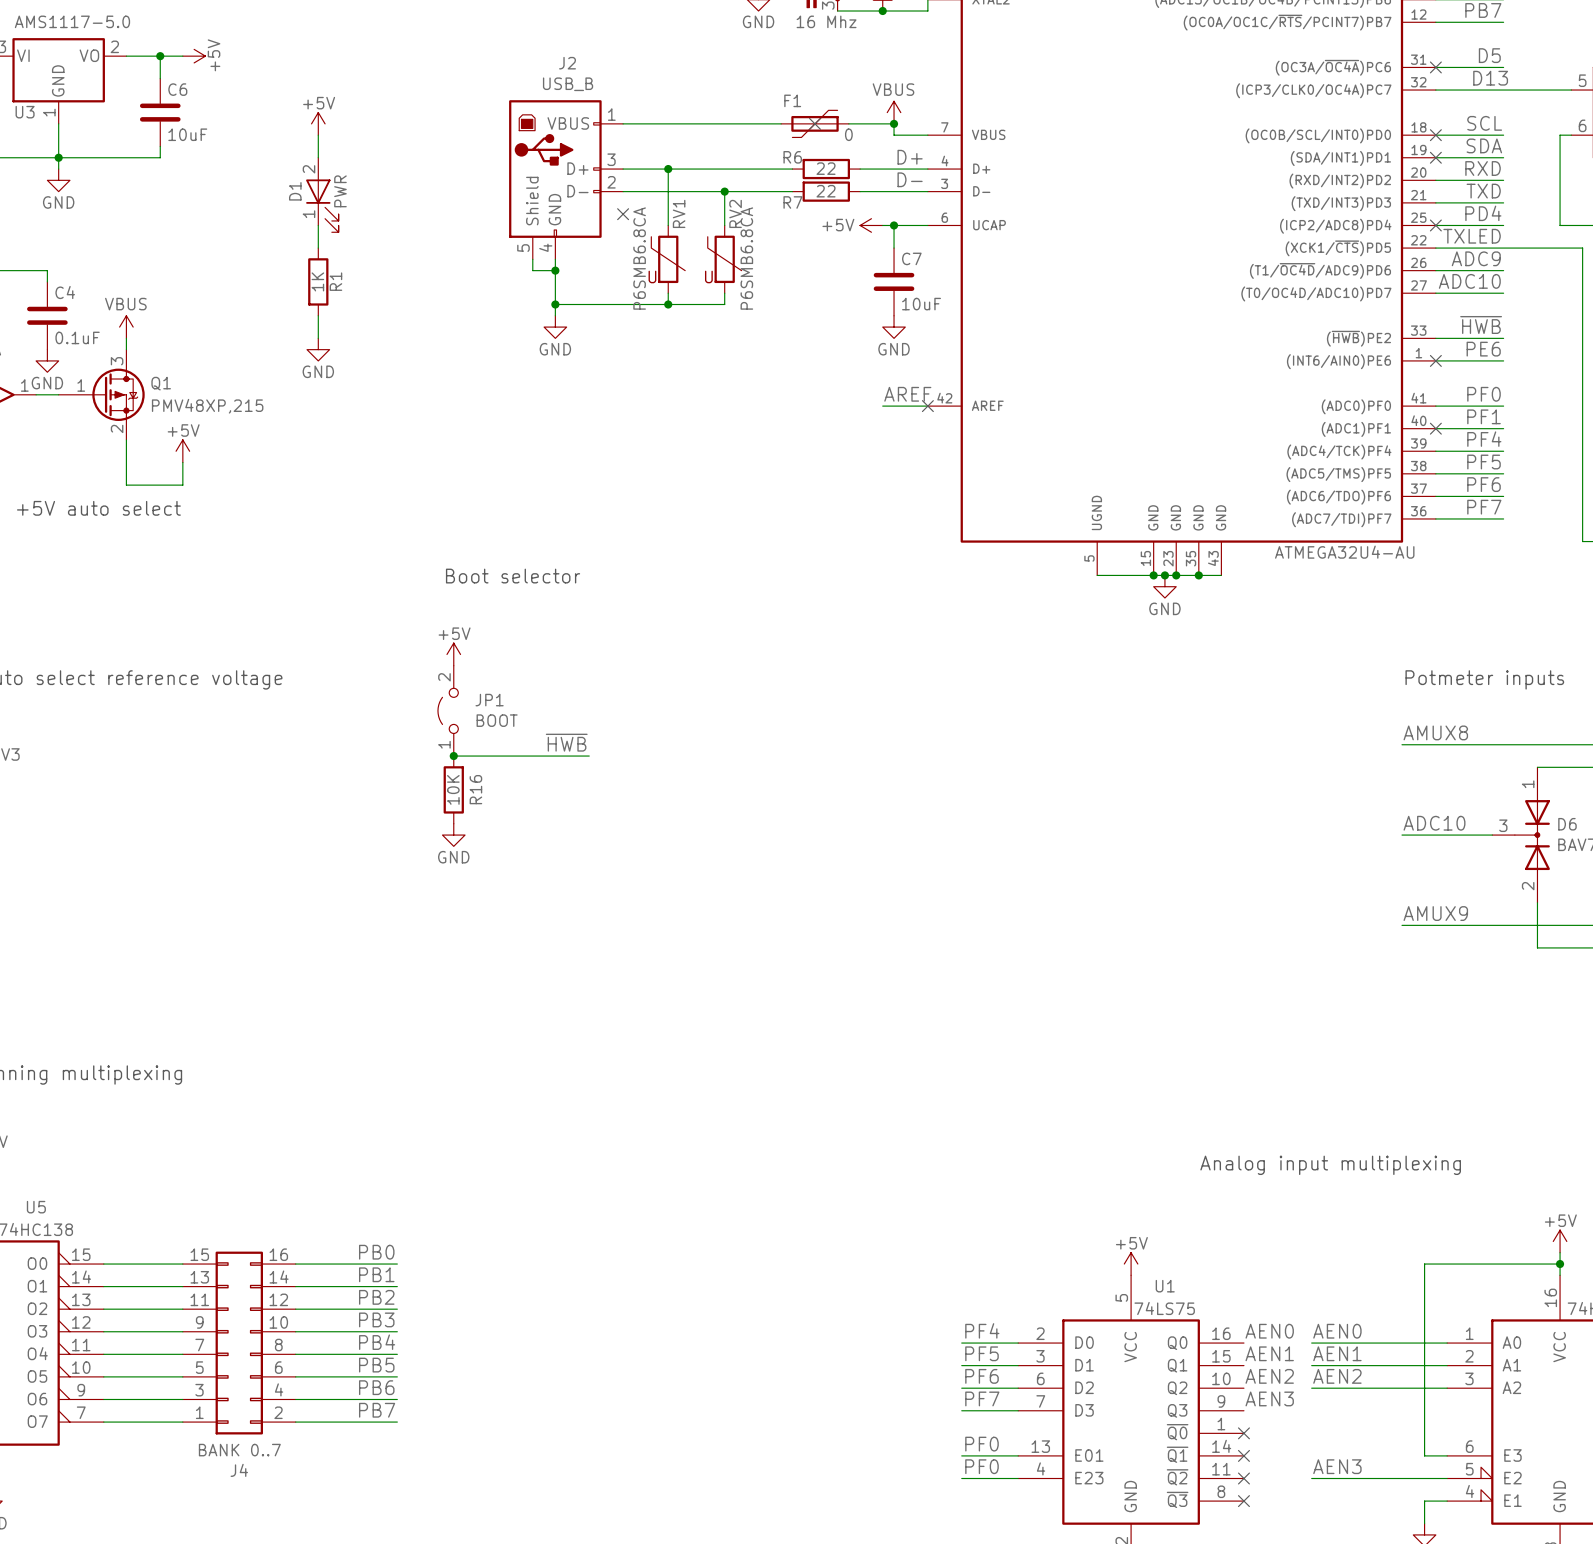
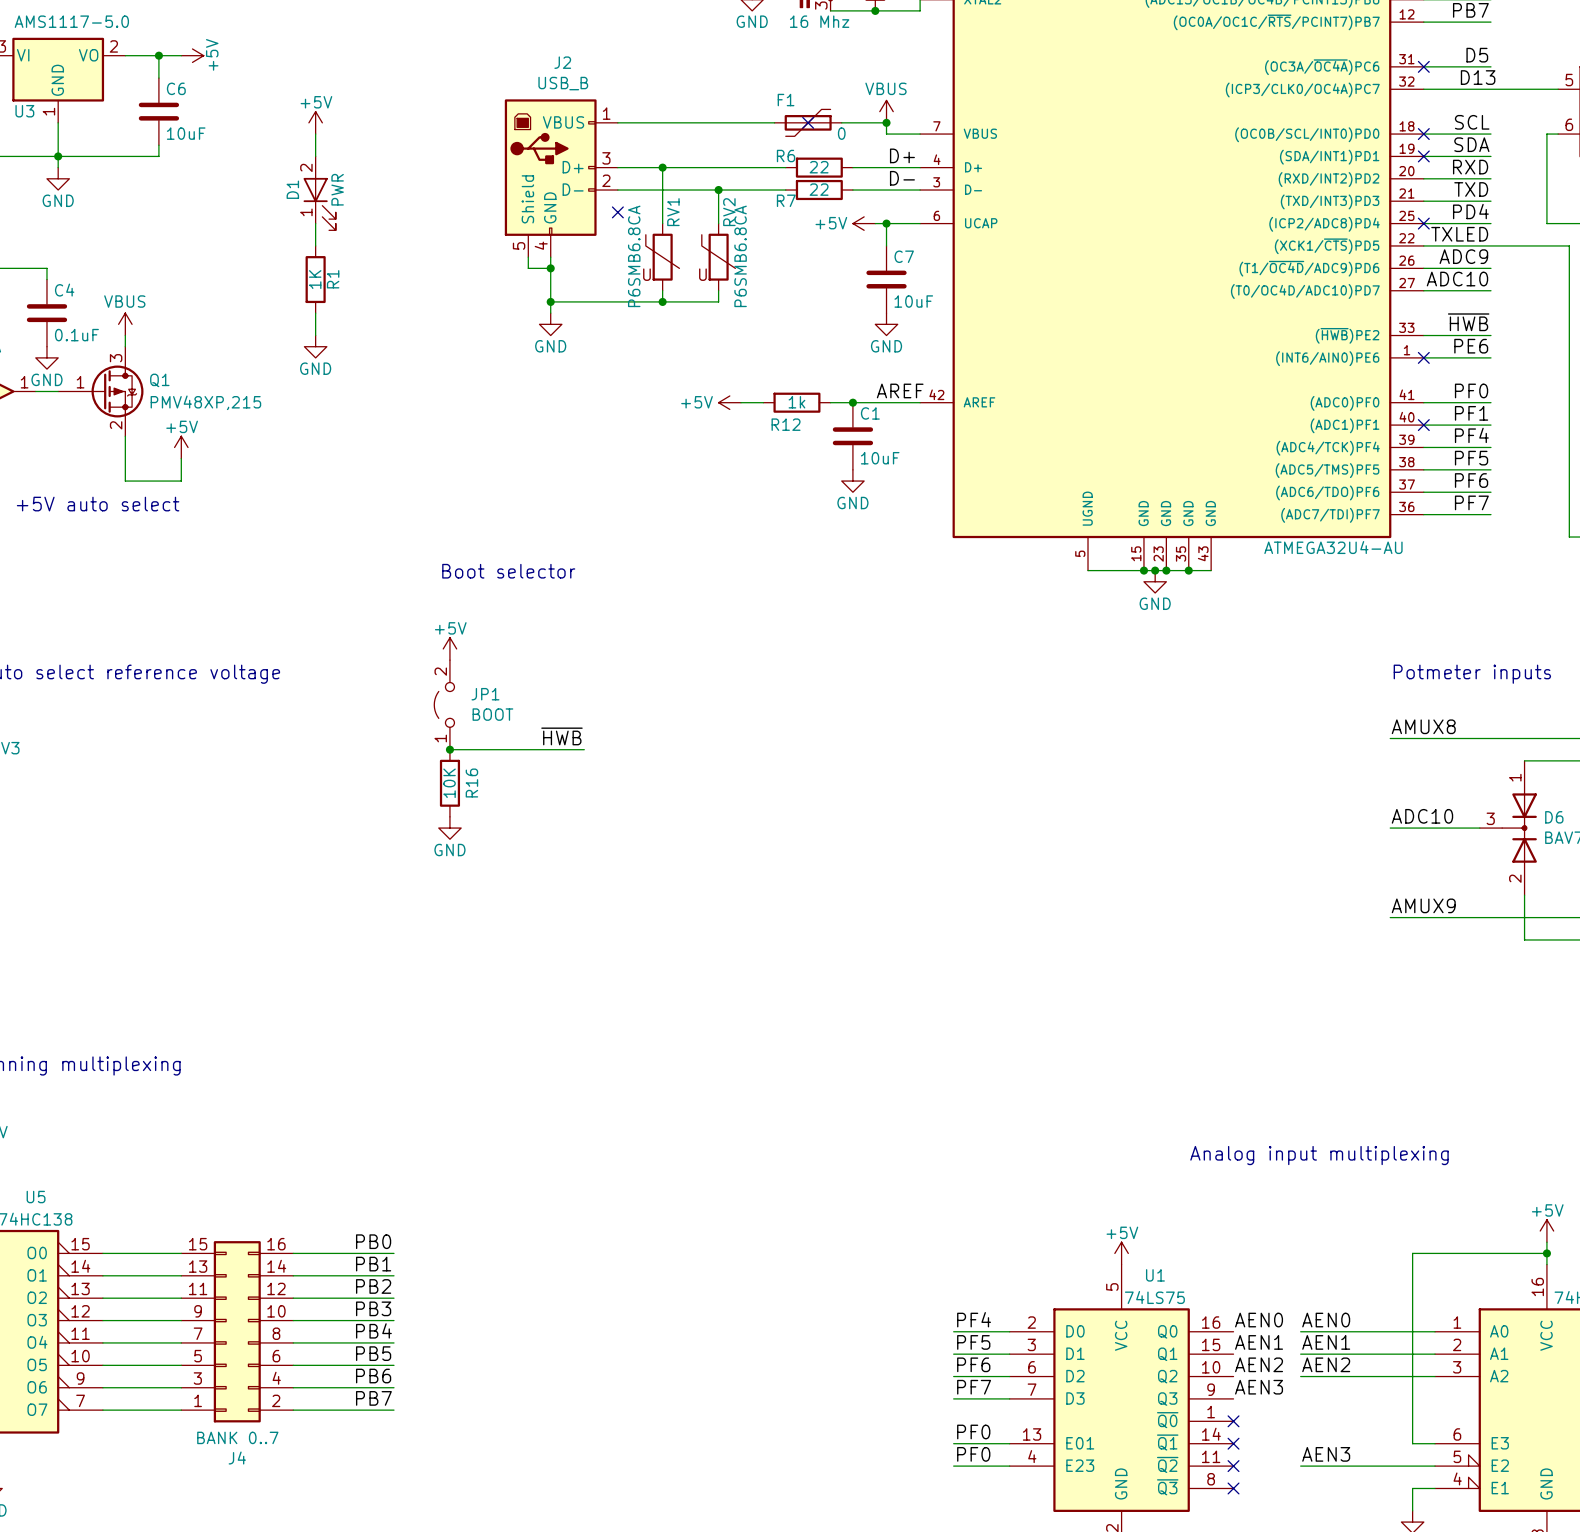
power symbol: none -> +5V (729, 402)
wire: none -> (741, 402) (763, 402)
R12: none -> 1k (796, 402)
wire: none -> (830, 402) (875, 402)
junction: none -> (852, 402)
no-connect mark: (927, 406) -> none
C1: none -> 10uF (852, 436)
power symbol: none -> GND (852, 481)

